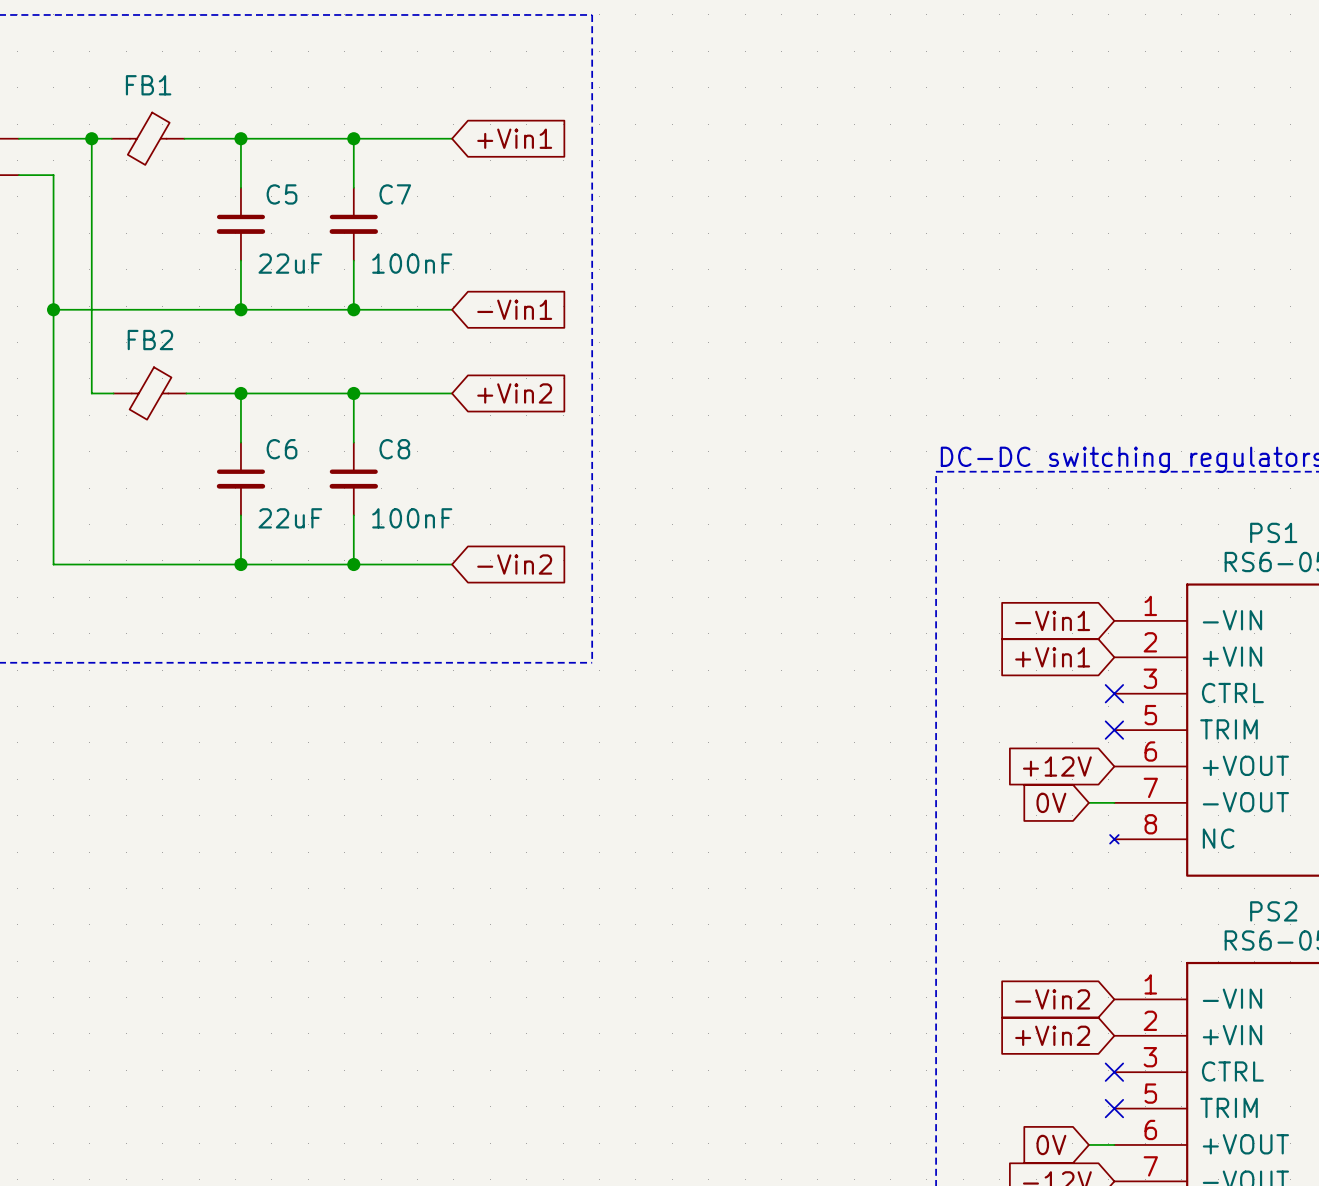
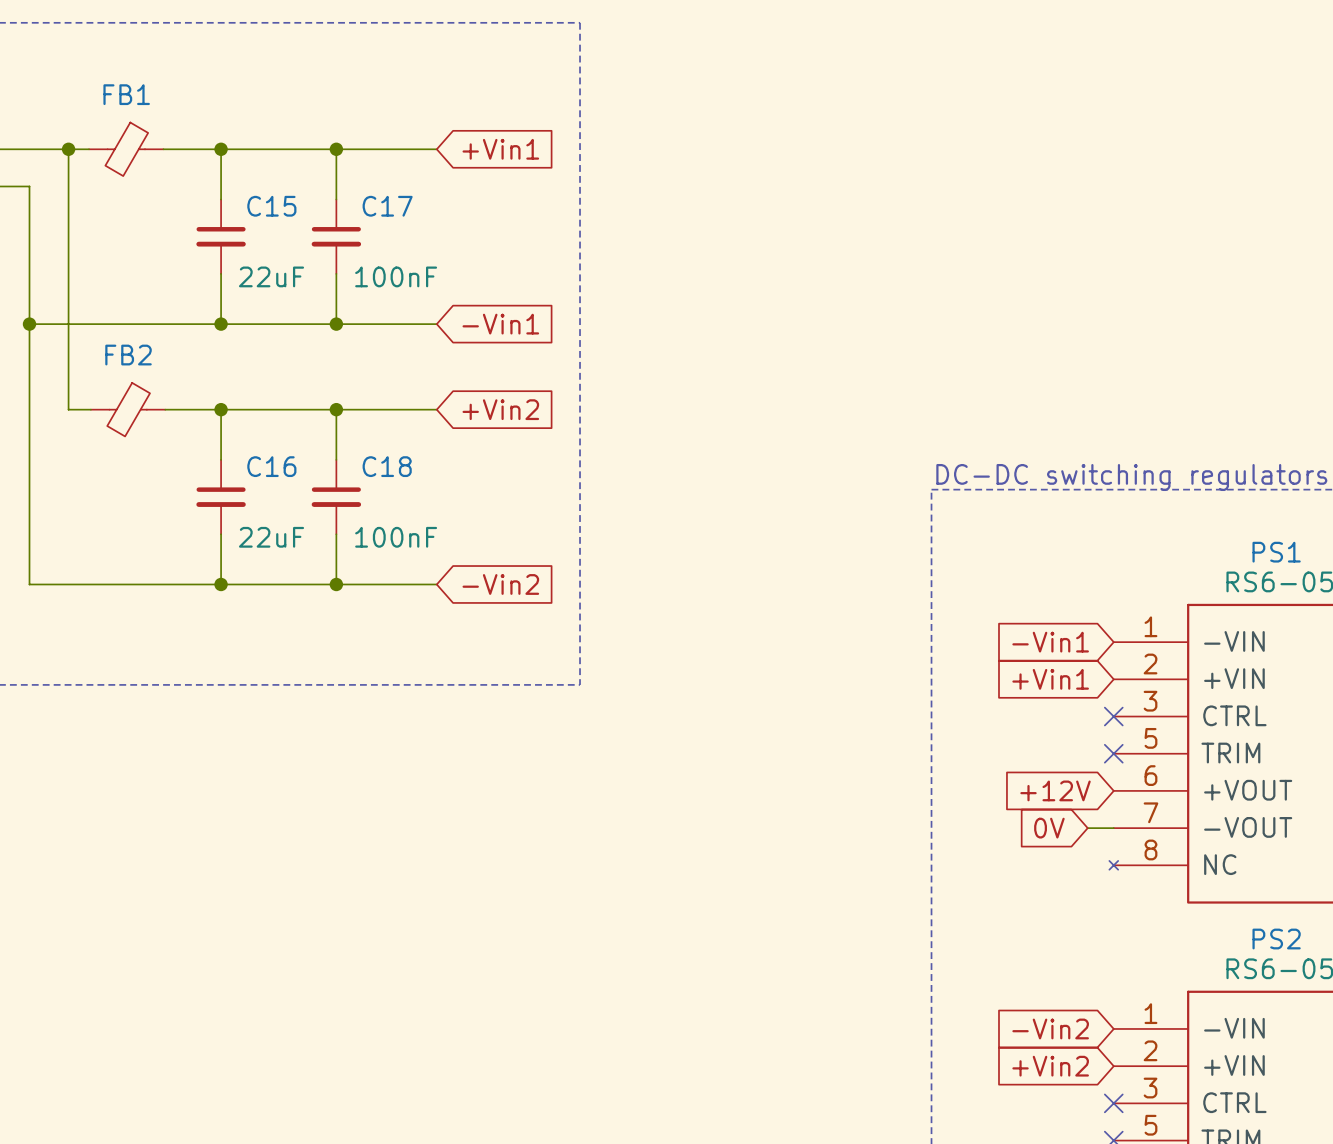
C5 name: C5 (282, 194) -> C15 (271, 206)
C7 name: C7 (395, 194) -> C17 (387, 206)
C6 name: C6 (282, 449) -> C16 (271, 466)
C8 name: C8 (394, 449) -> C18 (387, 466)

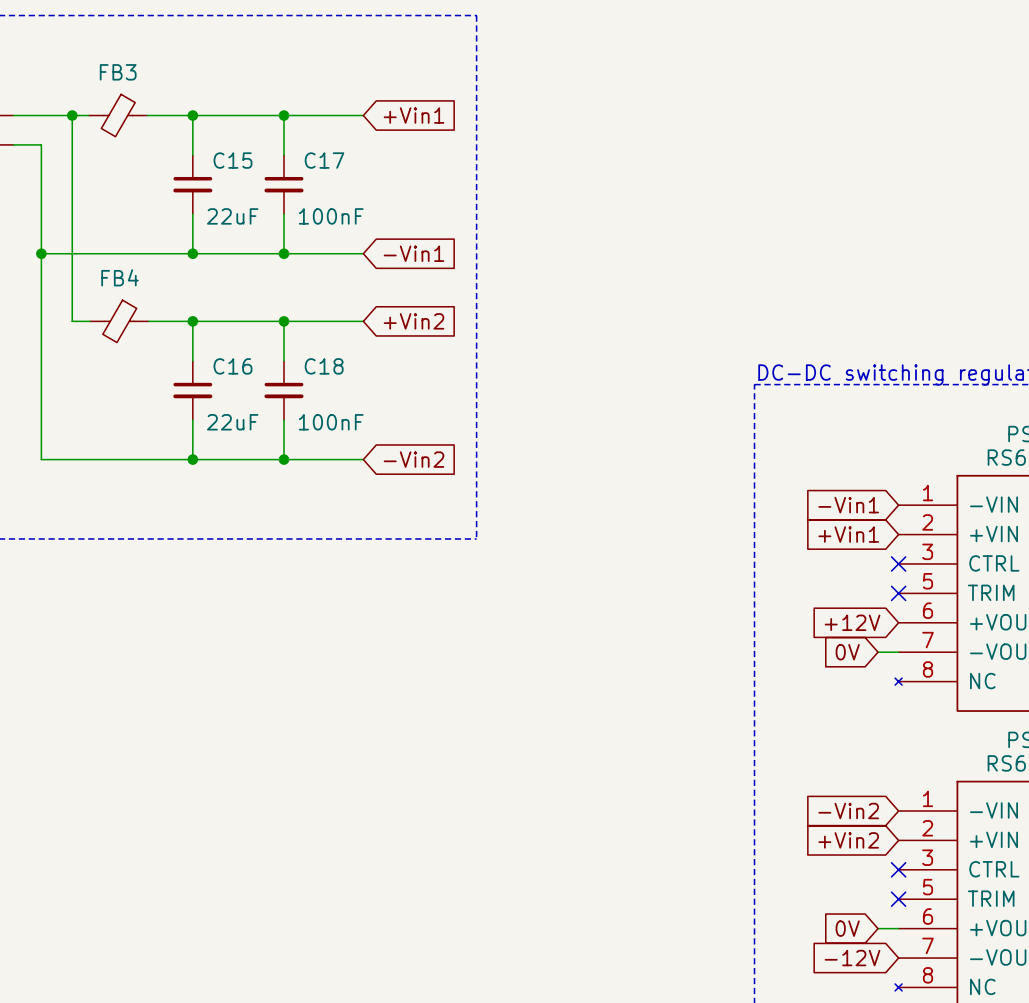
FB1 name: FB1 (126, 94) -> FB3 (118, 72)
FB2 name: FB2 (128, 355) -> FB4 (120, 277)

